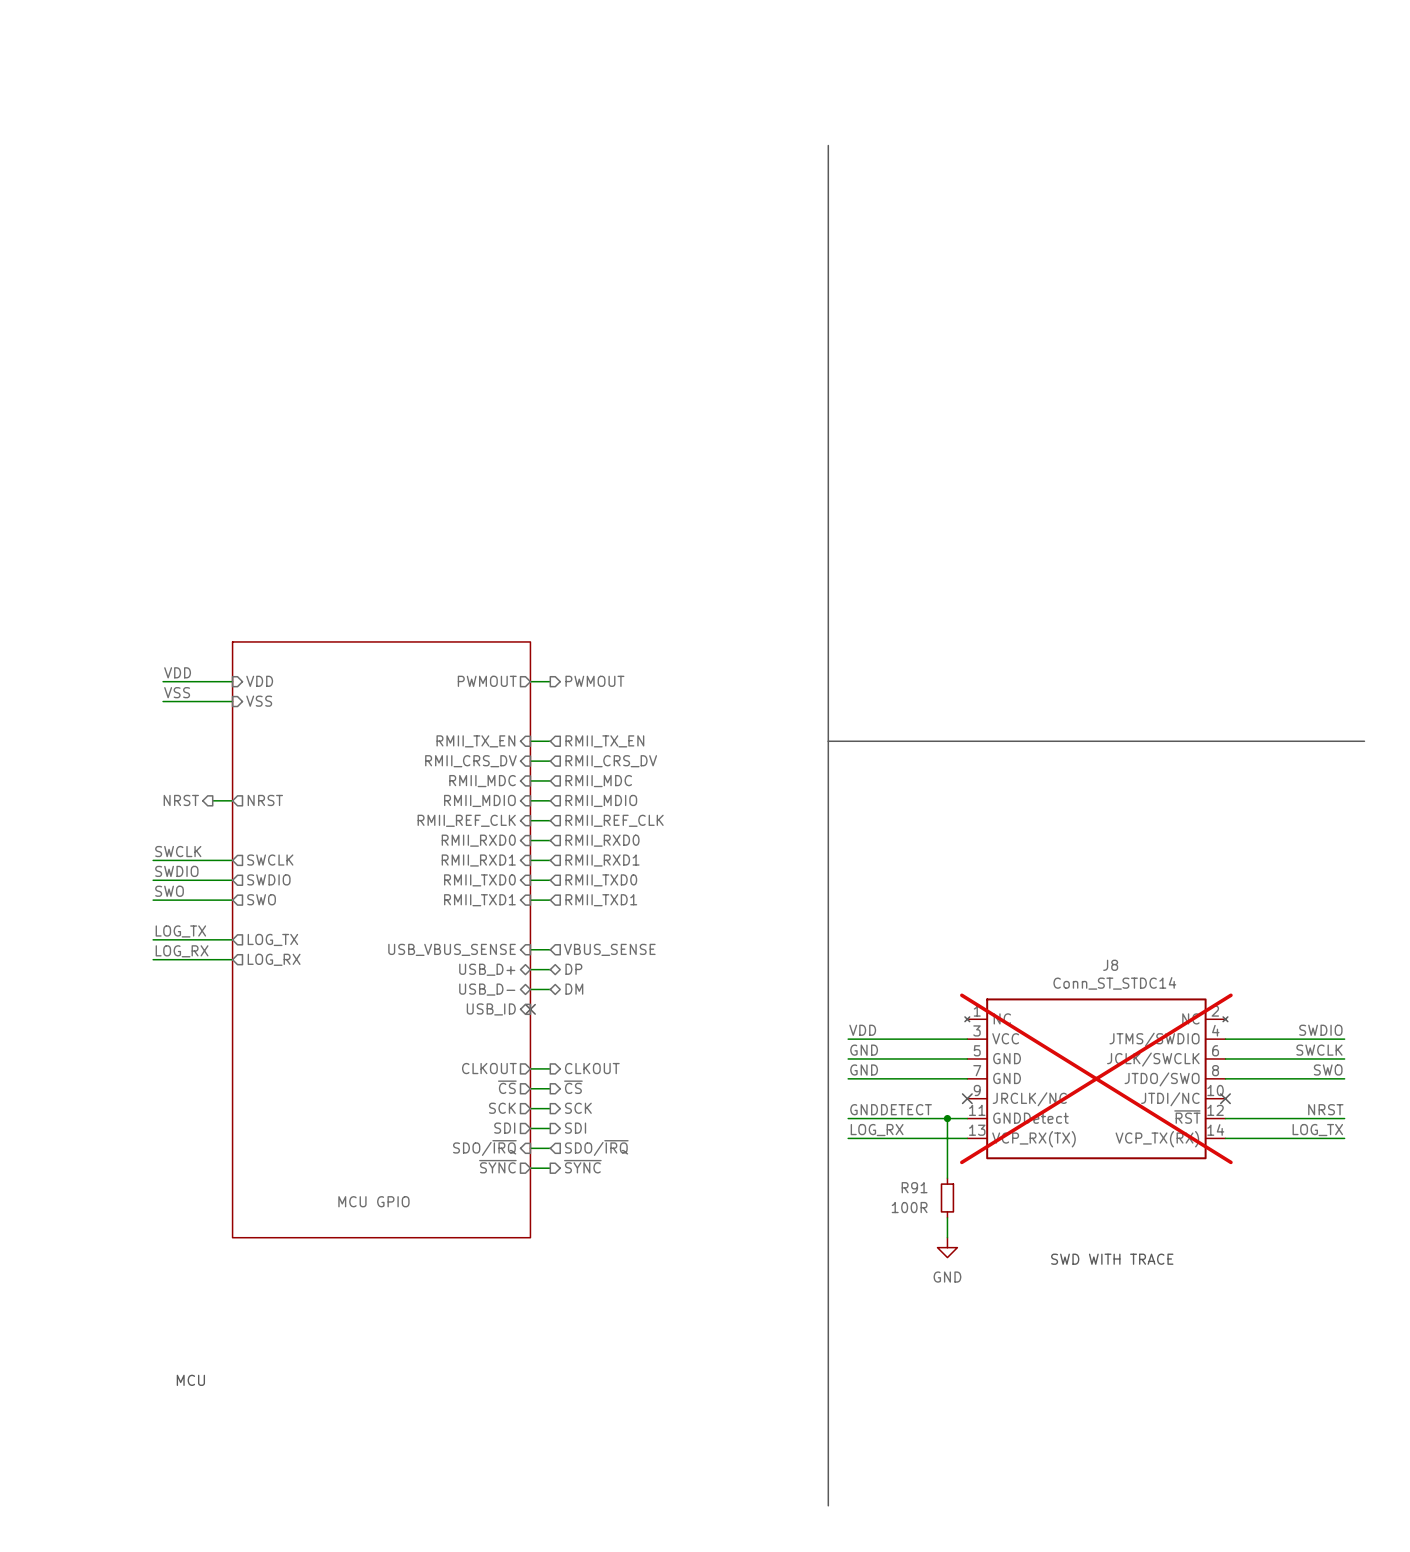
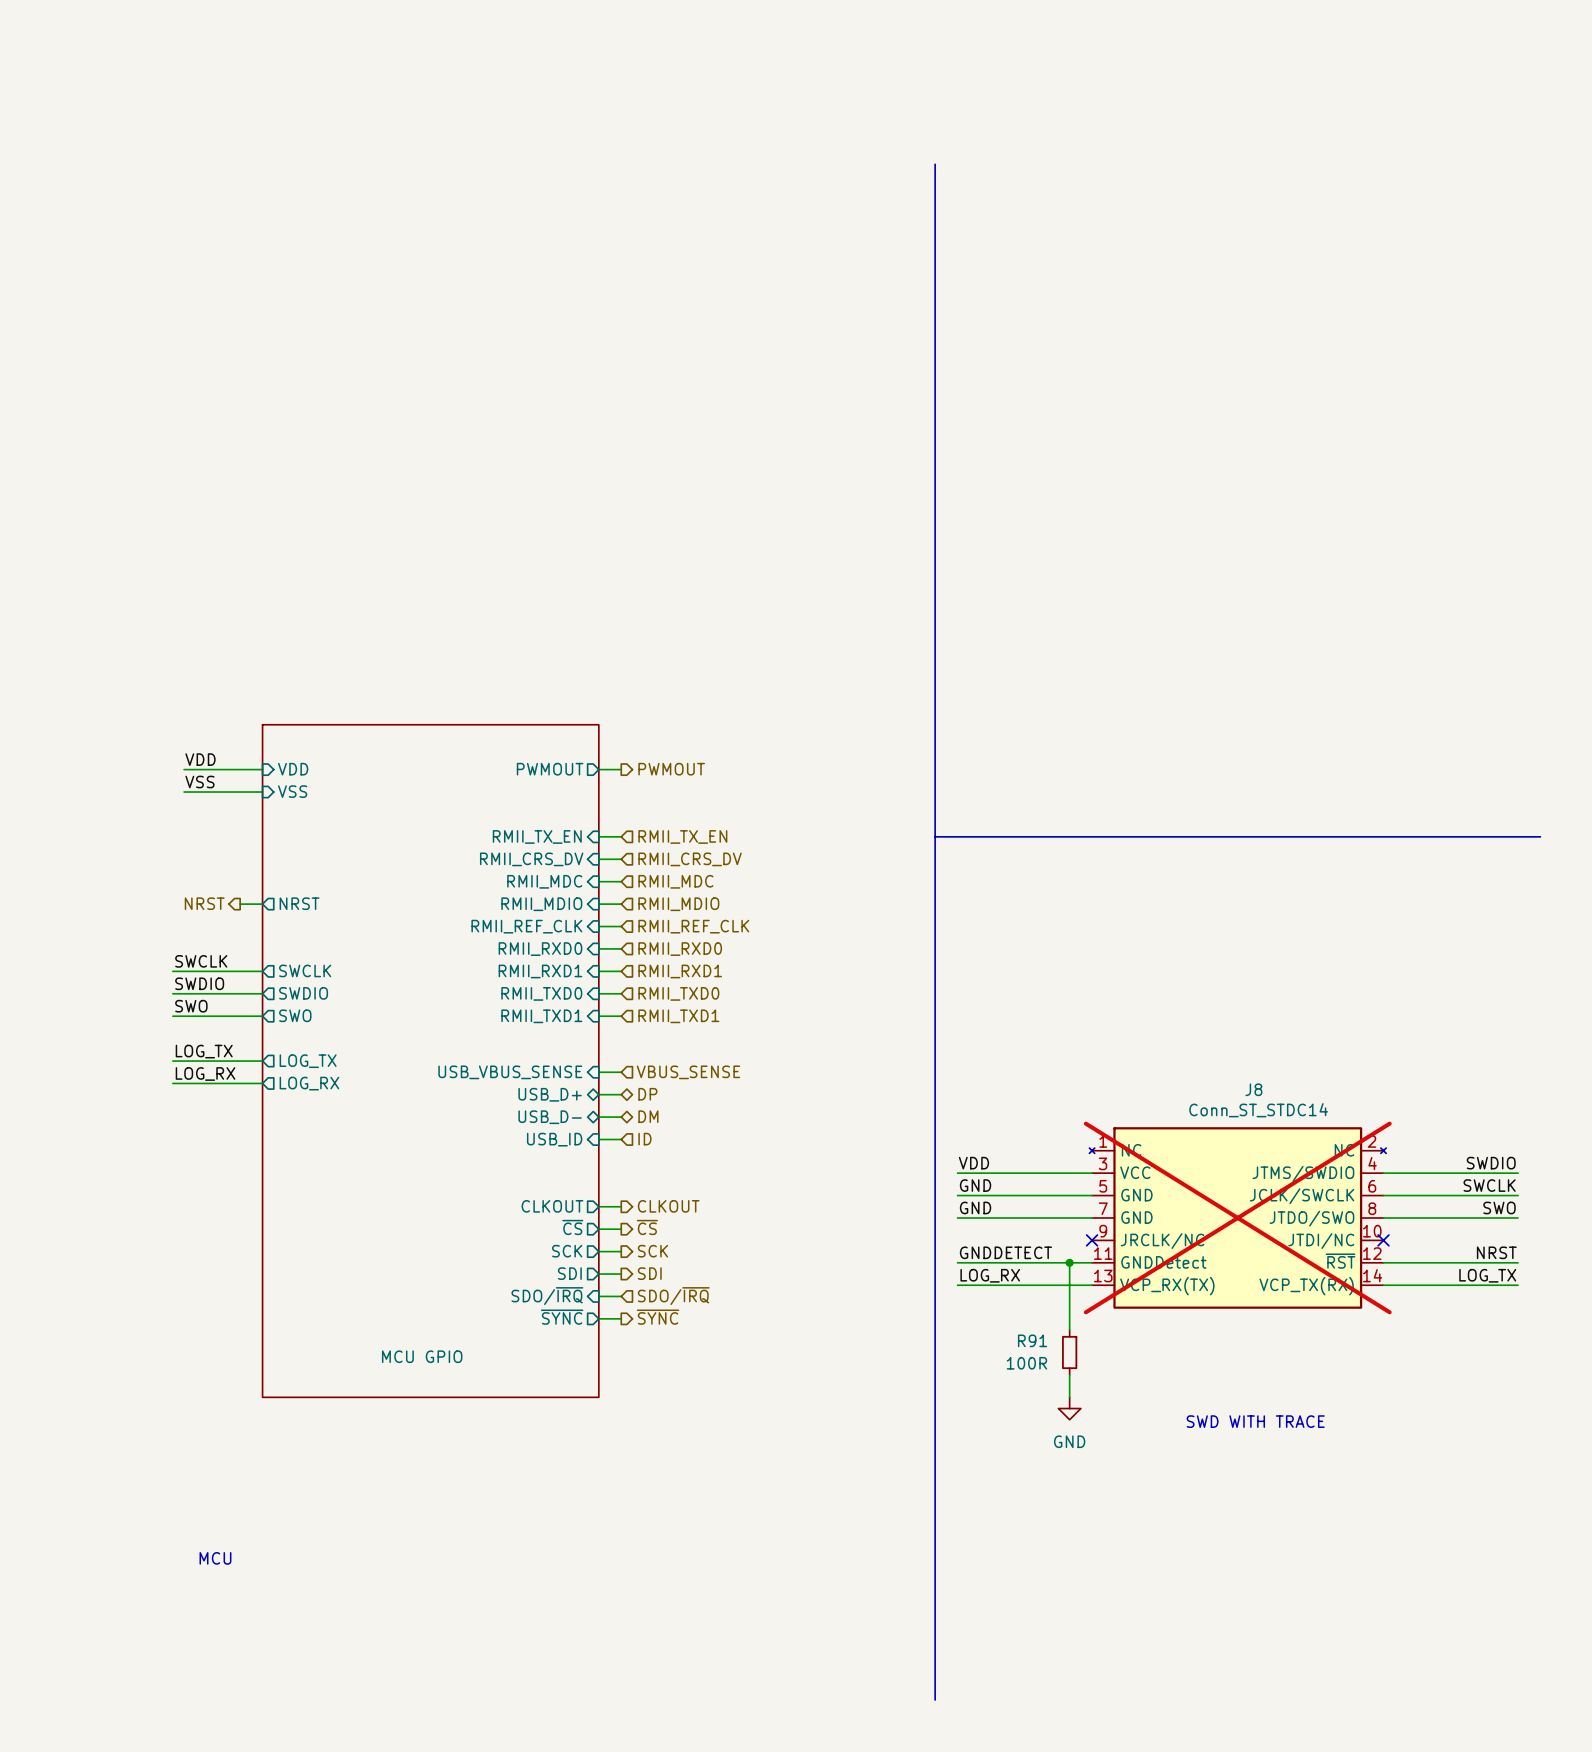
hierarchical label: none -> ID (644, 1139)
wire: none -> (598, 1139) (621, 1139)
no-connect mark: (530, 1009) -> none

